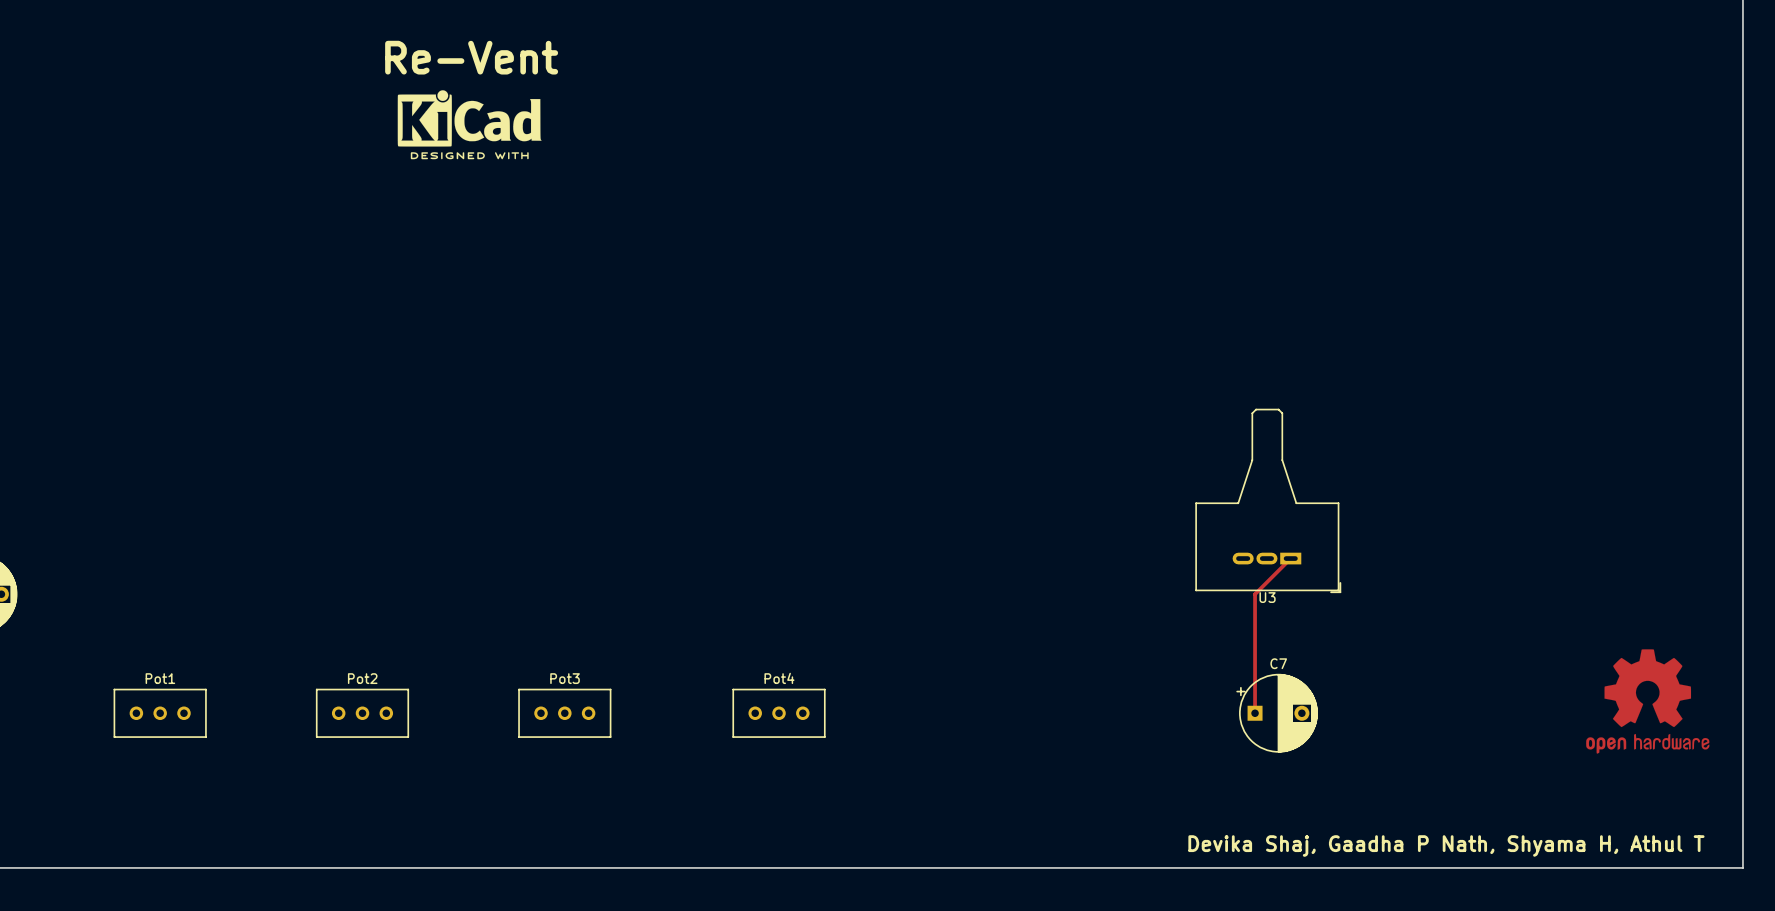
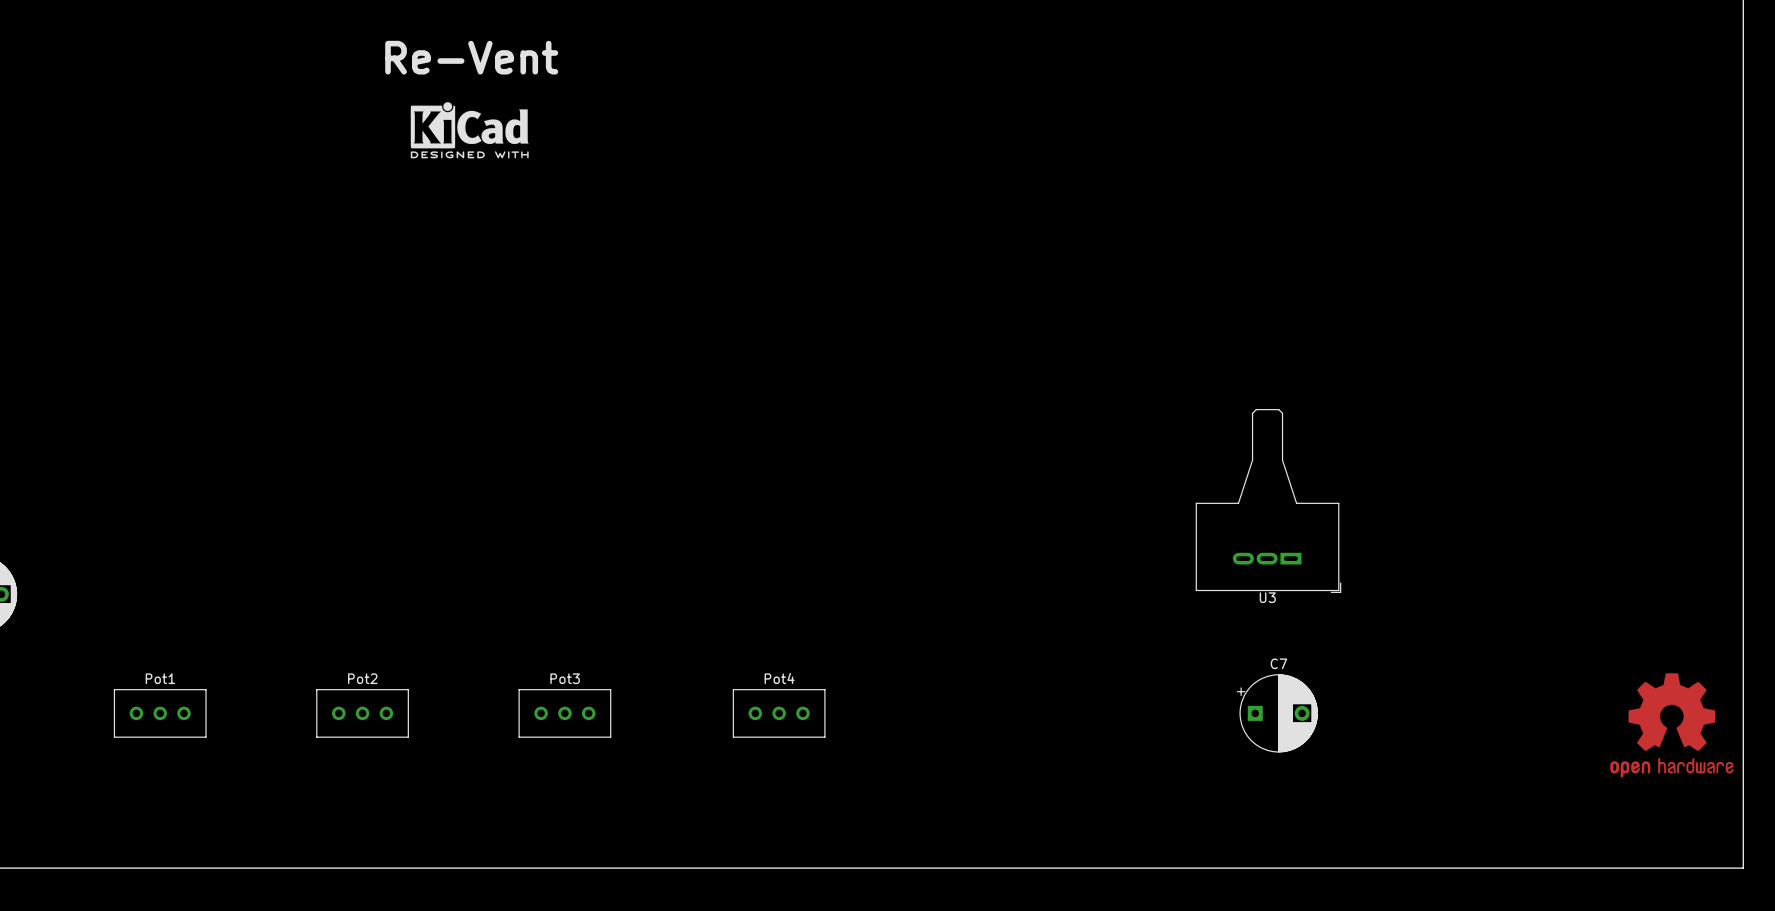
drawing shape: [397, 90, 542, 160] -> [410, 102, 529, 159]
track: (1290, 558) (1255, 594) (1255, 713) -> none
drawing position: (1647, 701) -> (1671, 725)
text: Devika Shaj, Gaadha P Nath, Shyama H, Athul T (1446, 845) -> none

